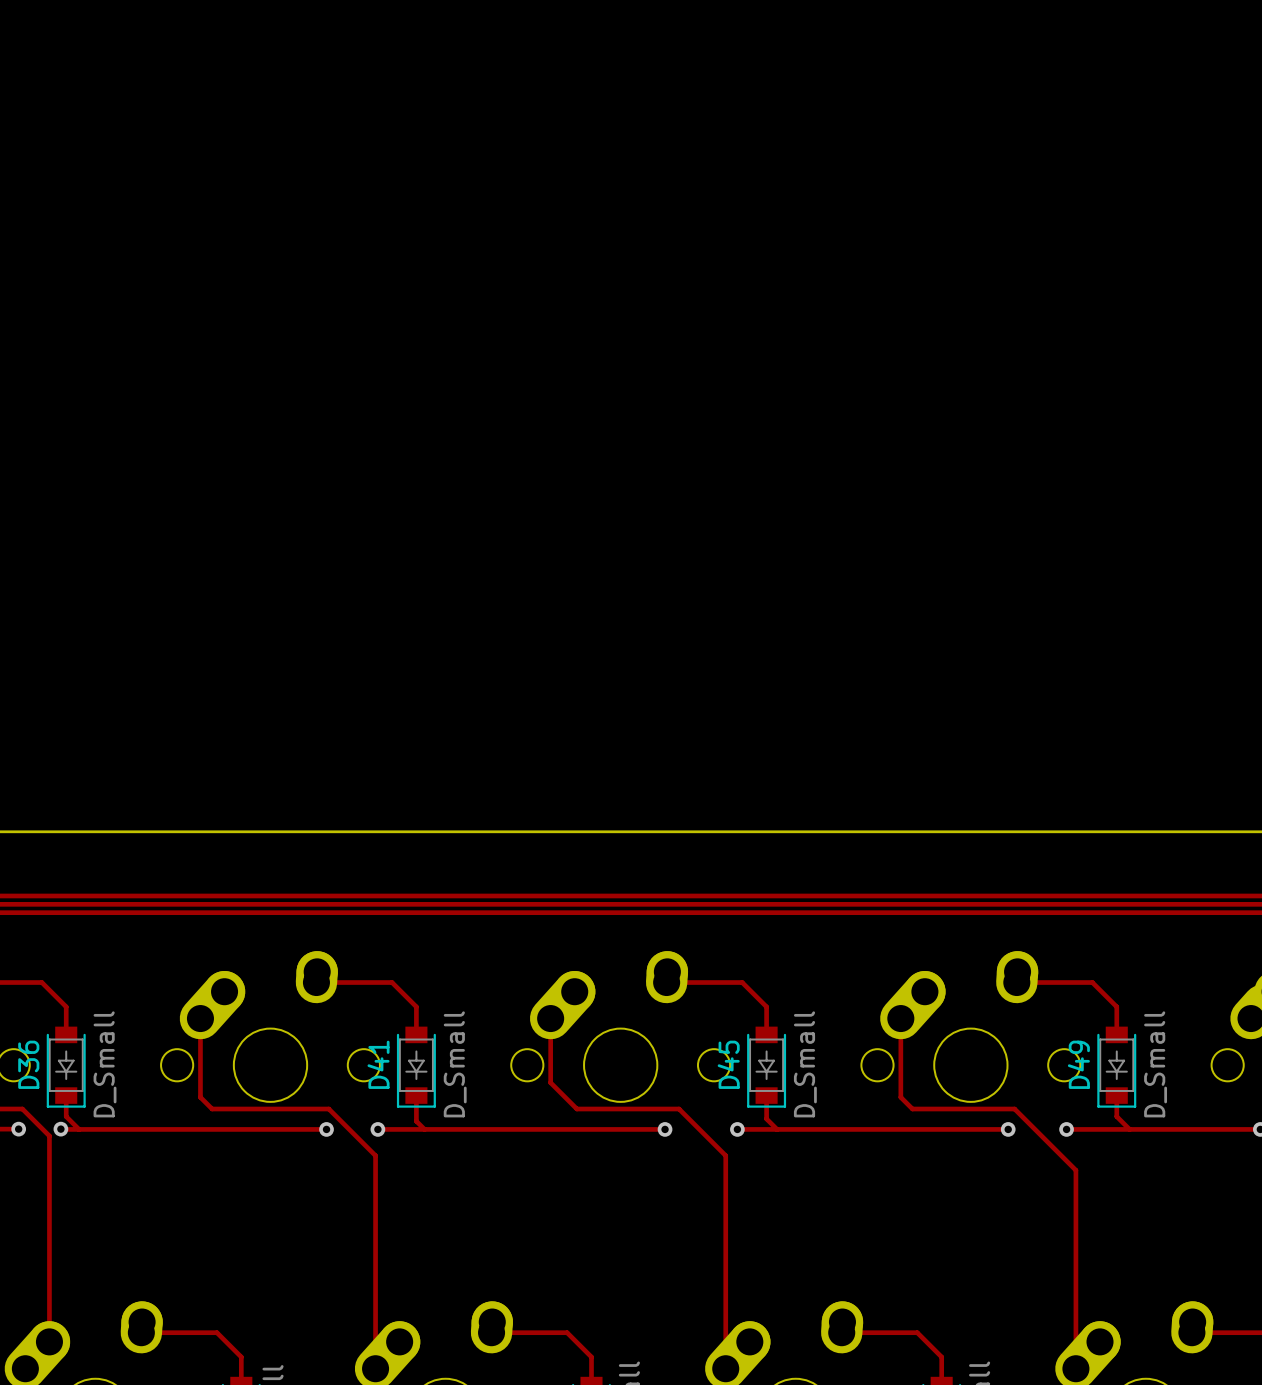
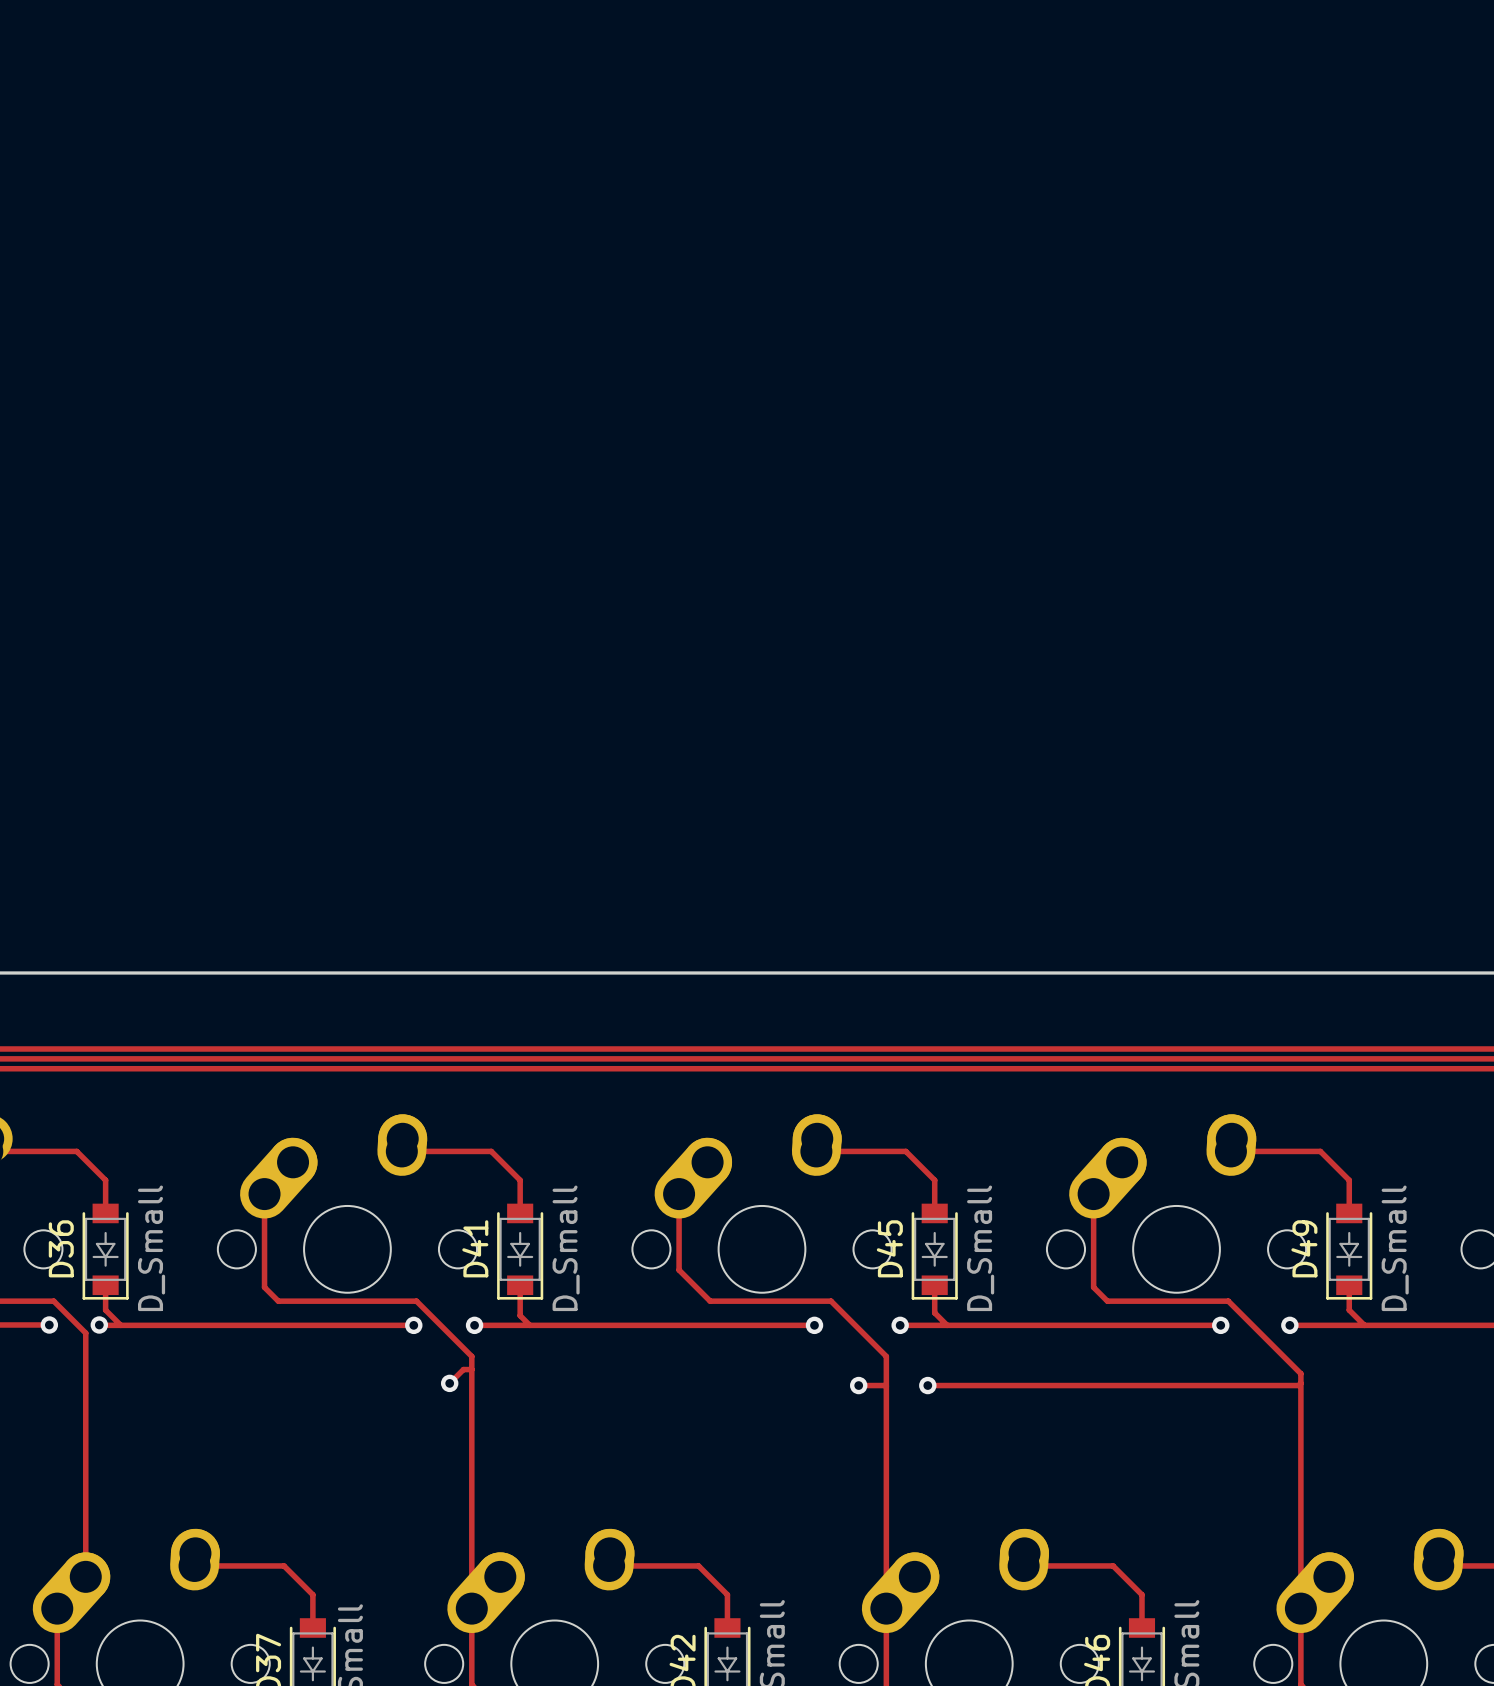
track: none -> (471, 1369) (463, 1369) (449, 1383)
via: none -> (449, 1383)
track: none -> (1300, 1383) (1298, 1385) (927, 1385)
track: none -> (858, 1385) (886, 1386)
via: none -> (858, 1385)
via: none -> (927, 1385)

